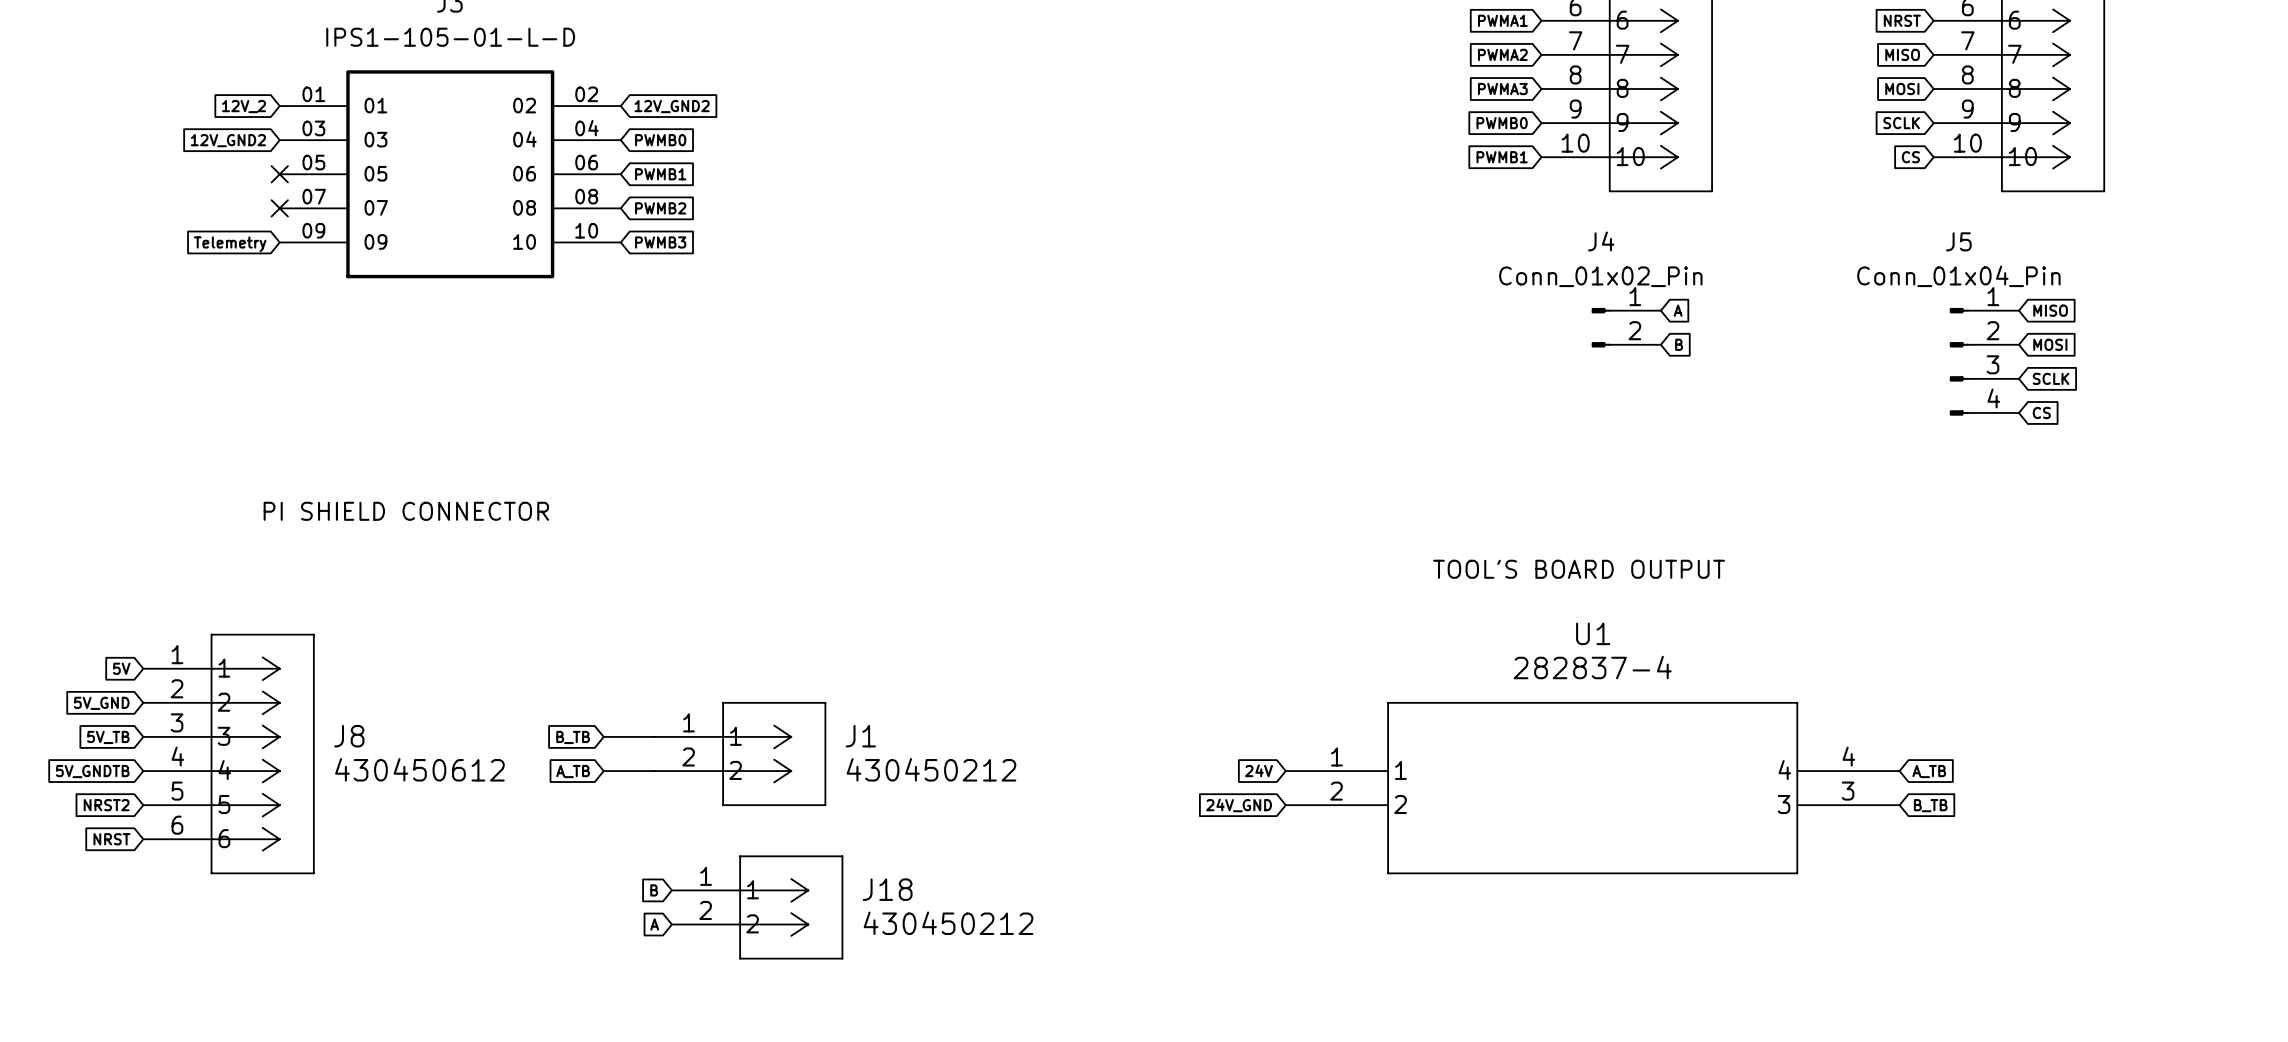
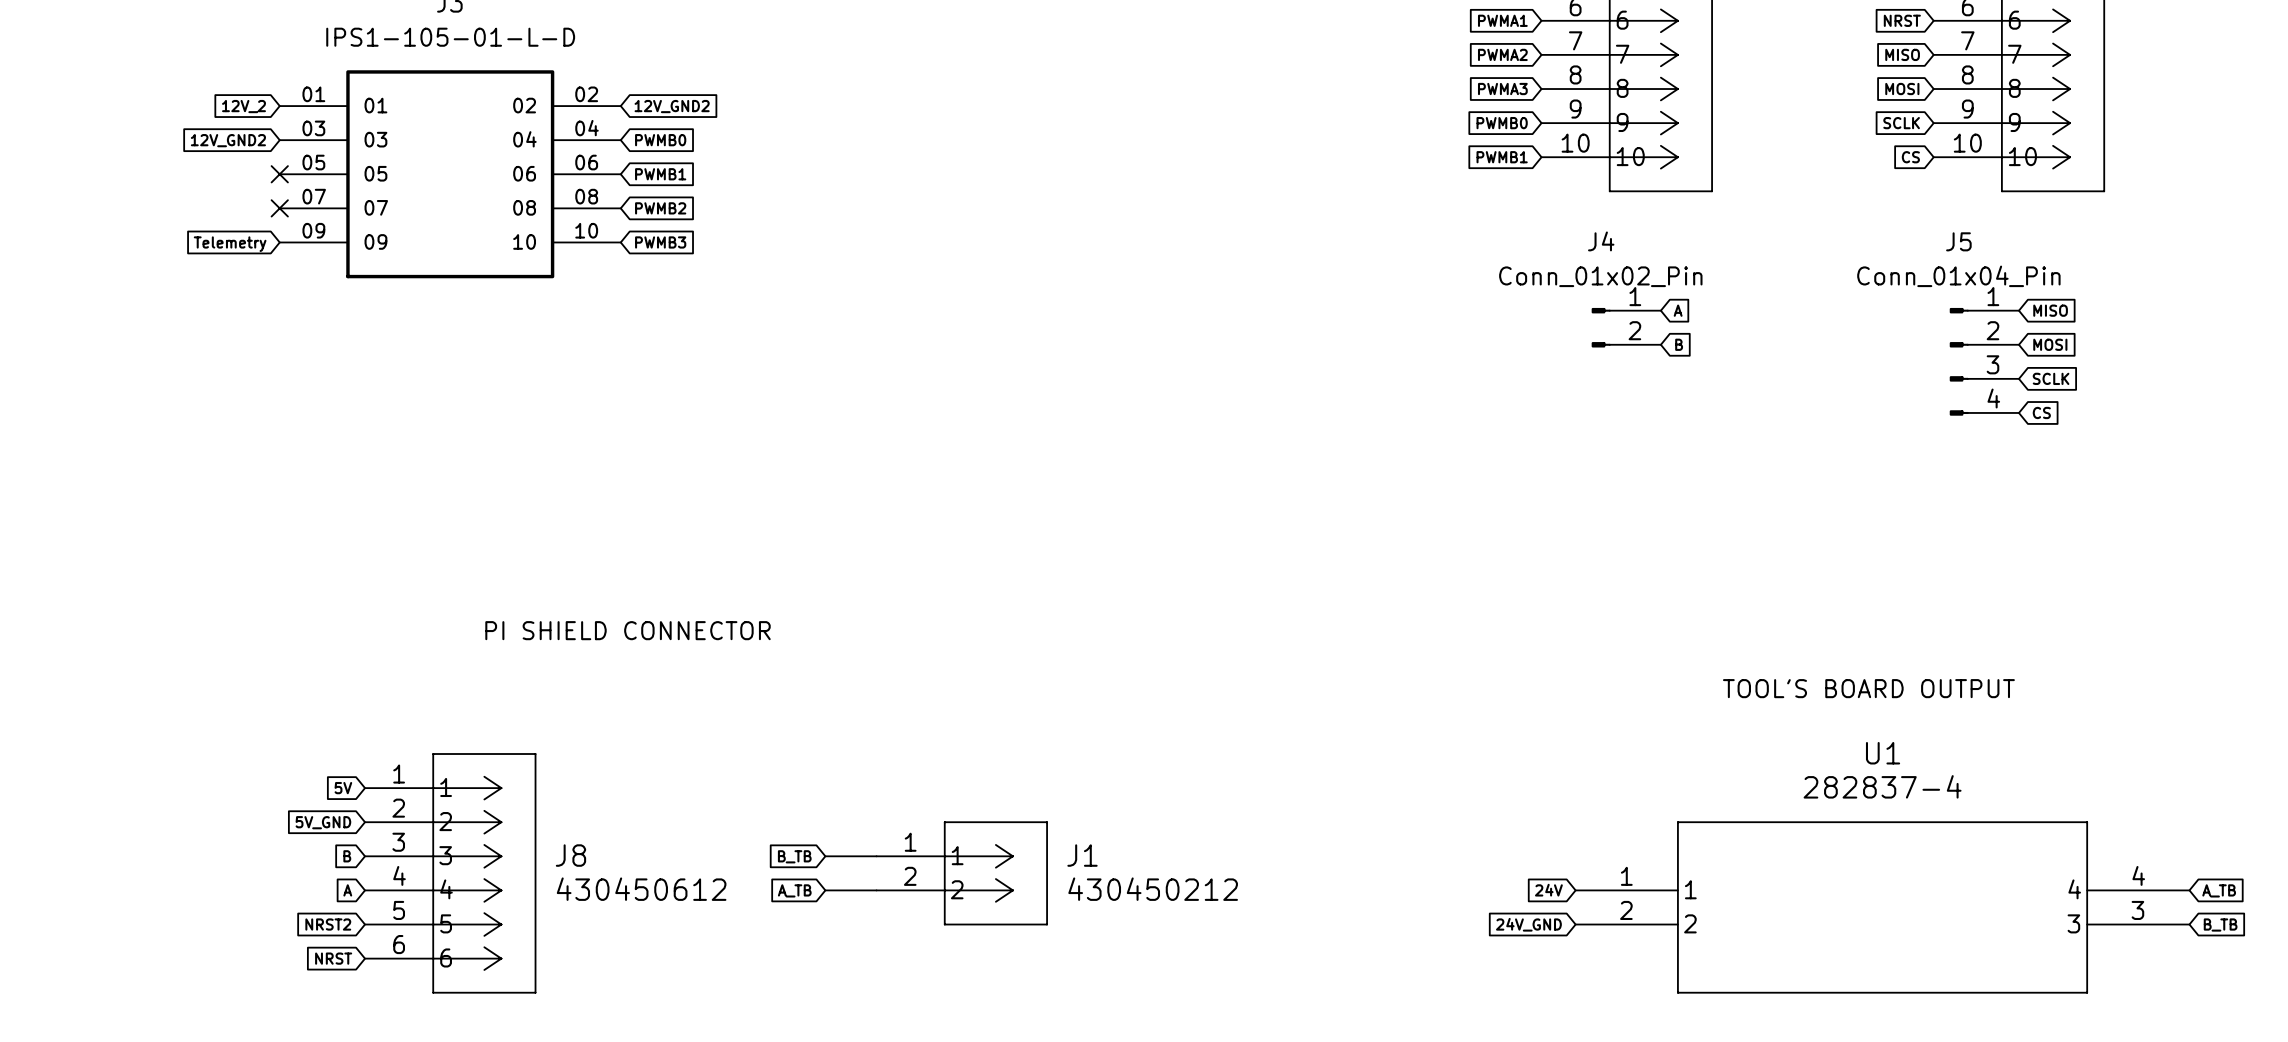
text position: PI SHIELD CONNECTOR (406, 511) -> PI SHIELD CONNECTOR (628, 630)
text position: TOOL'S BOARD OUTPUT (1579, 569) -> TOOL'S BOARD OUTPUT (1868, 688)
global label position: 5V (121, 668) -> 5V (343, 788)
global label position: 5V_GND (101, 703) -> 5V_GND (323, 822)
wire: (603, 736) (654, 736) -> (825, 856) (876, 856)
global label: 5V_TB (108, 737) -> none
global label position: B_TB (573, 737) -> B_TB (794, 856)
J8 position: (229, 754) -> (450, 873)
J1 position: (740, 754) -> (962, 873)
global label position: 24V (1259, 770) -> 24V (1548, 890)
global label: 5V_GNDTB (92, 771) -> none
global label position: A_TB (573, 771) -> A_TB (794, 890)
wire: (603, 771) (654, 771) -> (825, 890) (876, 890)
global label position: A_TB (1929, 771) -> A_TB (2219, 890)
U1 position: (1592, 788) -> (1882, 907)
global label position: NRST2 (106, 805) -> NRST2 (328, 924)
global label position: 24V_GND (1239, 805) -> 24V_GND (1528, 924)
global label position: B_TB (1930, 805) -> B_TB (2220, 925)
global label position: NRST (111, 839) -> NRST (333, 958)
global label position: B (654, 890) -> B (347, 856)
J18: 430450212 (757, 907) -> none
global label position: A (654, 924) -> A (347, 890)

